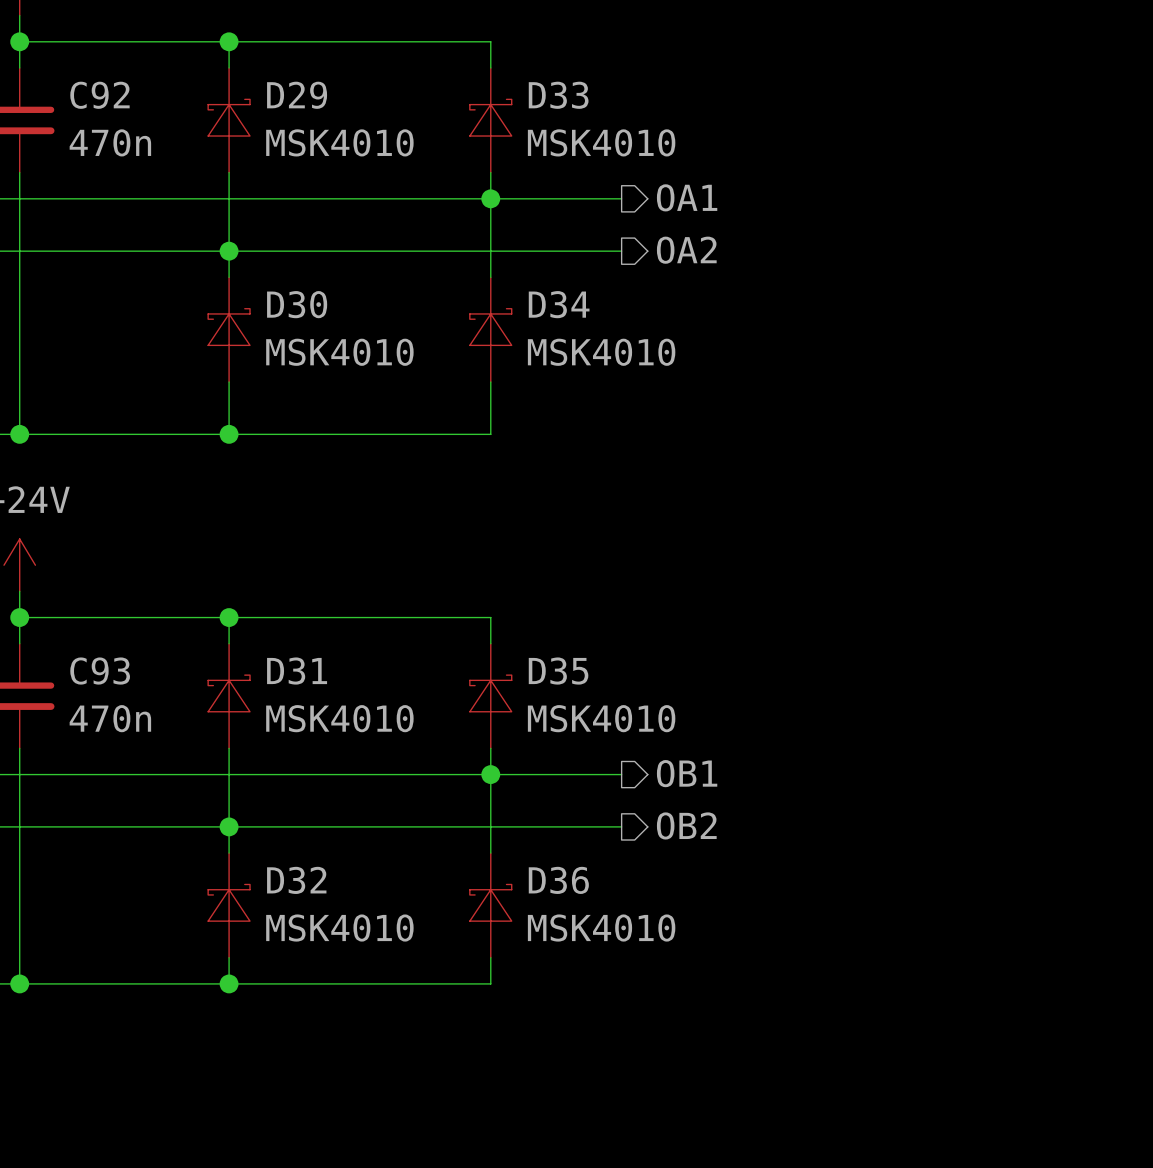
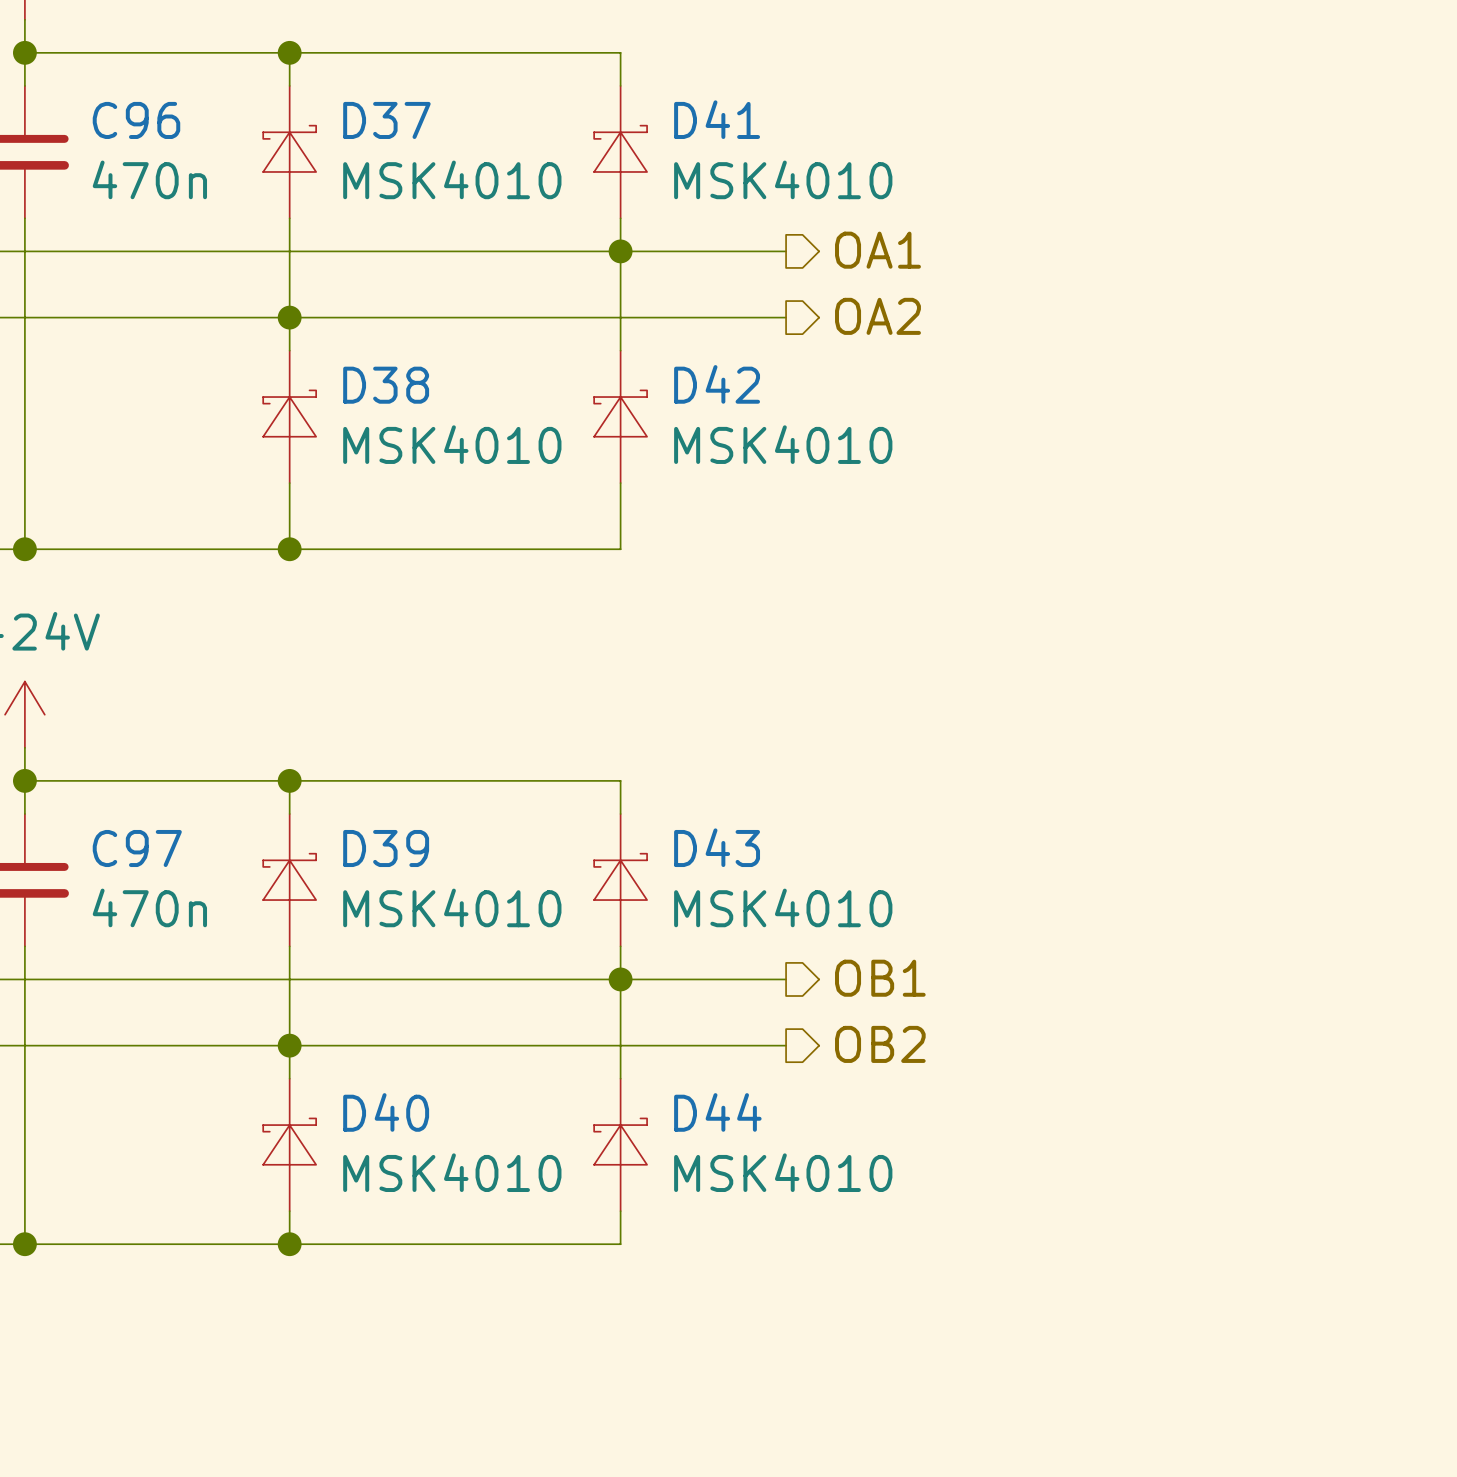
C92 name: C92 (99, 95) -> C96 (136, 120)
D29 name: D29 (297, 95) -> D37 (386, 120)
D33 name: D33 (558, 95) -> D41 (717, 119)
D30 name: D30 (297, 304) -> D38 (386, 385)
D34 name: D34 (559, 304) -> D42 (717, 384)
C93 name: C93 (100, 671) -> C97 (137, 848)
D31 name: D31 (297, 671) -> D39 (386, 848)
D35 name: D35 (558, 671) -> D43 (717, 847)
D32 name: D32 (296, 880) -> D40 (386, 1112)
D36 name: D36 (558, 880) -> D44 (717, 1112)

